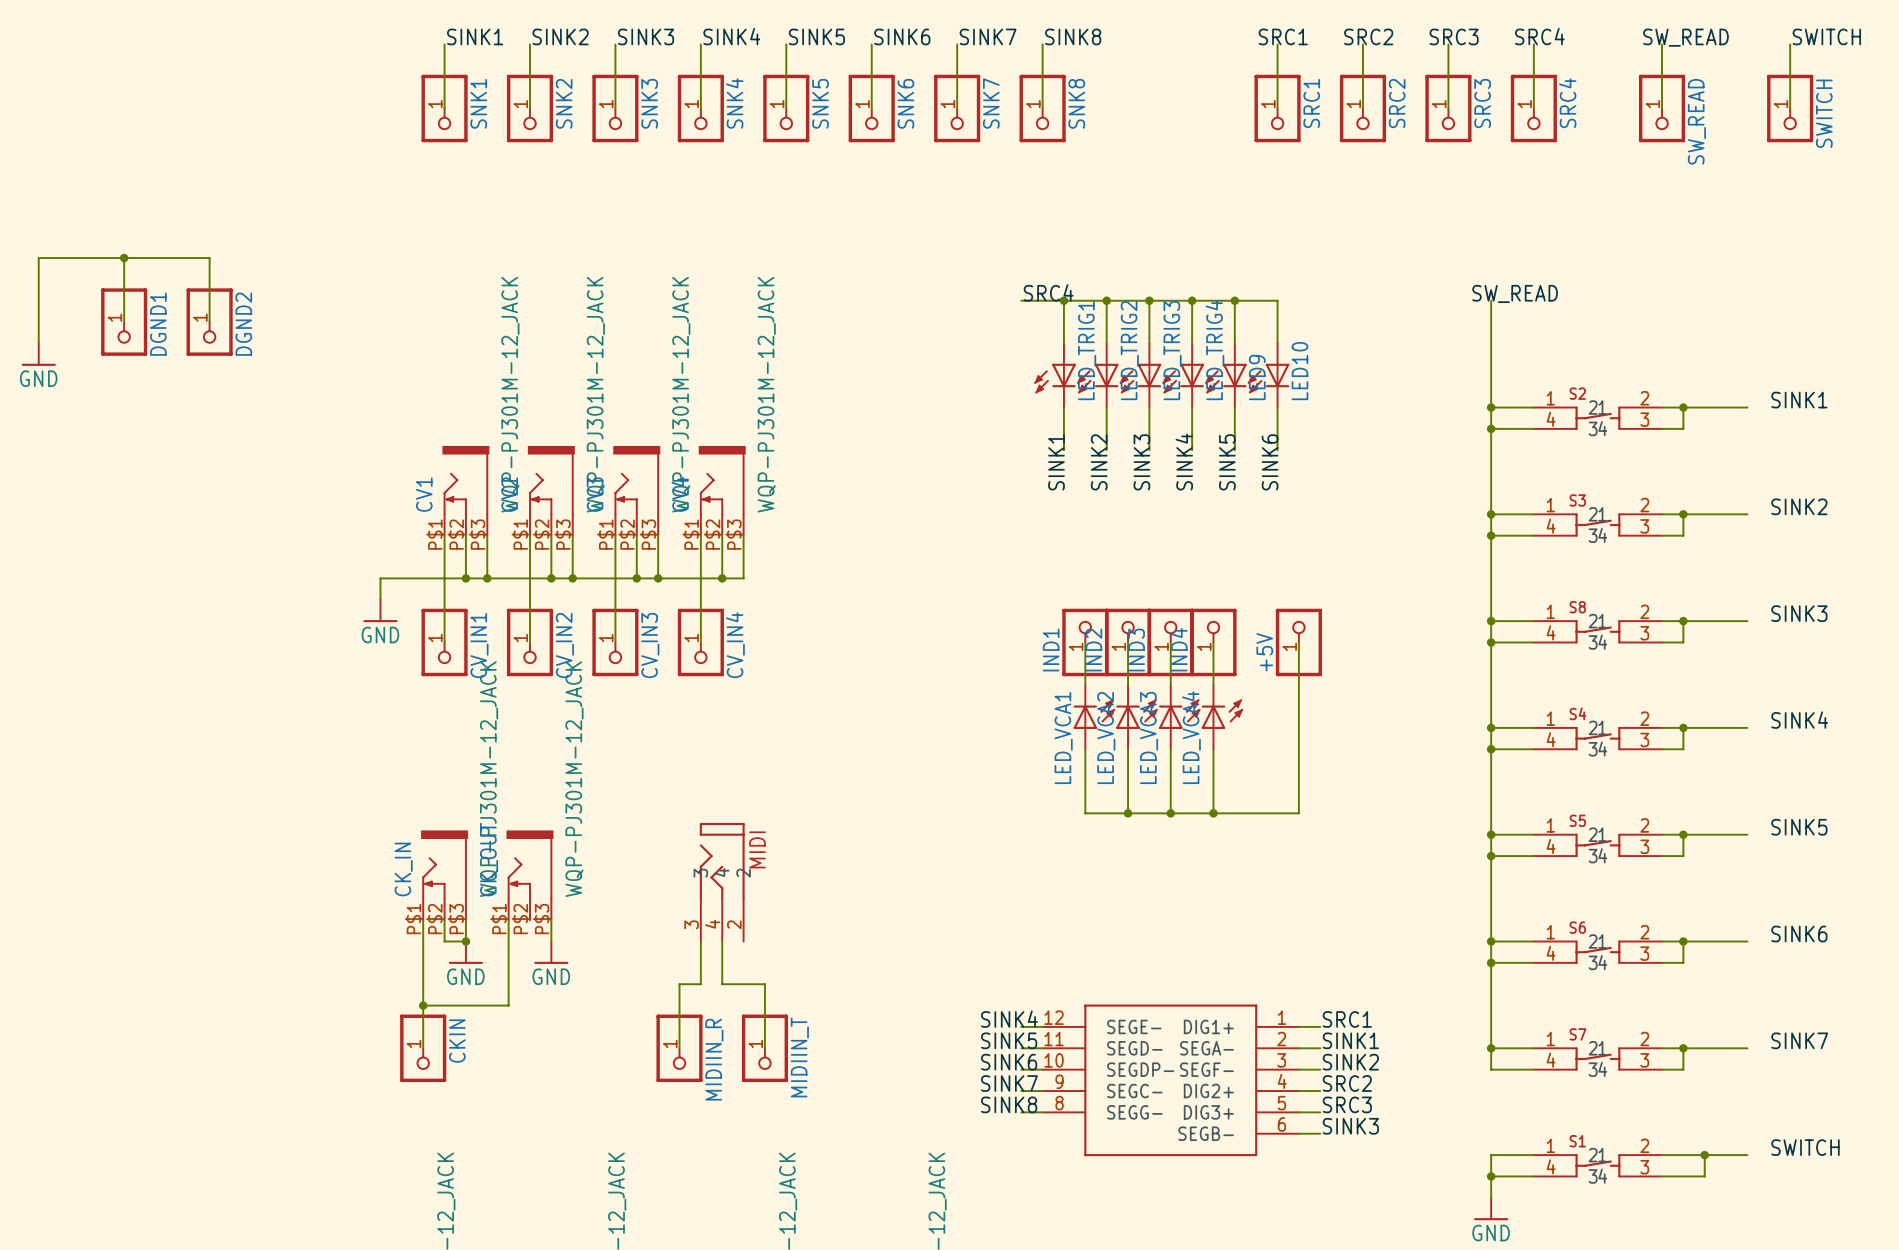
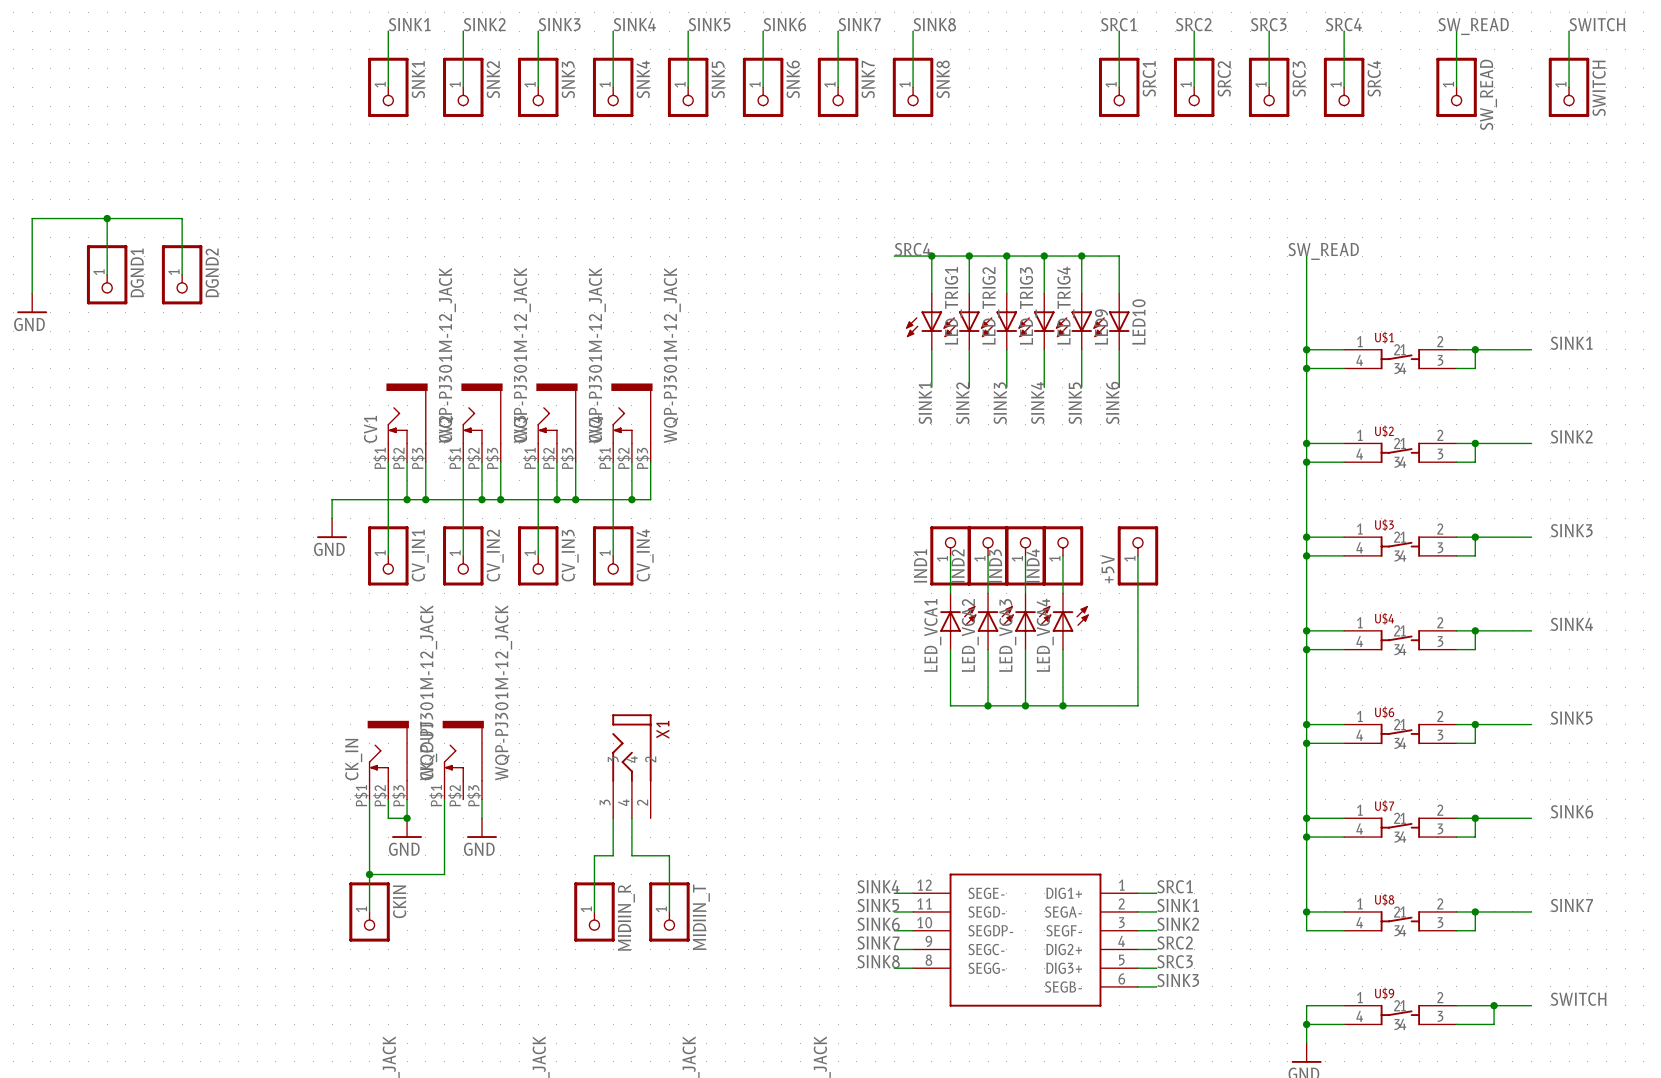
S2 name: S2 (1577, 393) -> U$1 (1384, 337)
S3 name: S3 (1577, 500) -> U$2 (1384, 431)
S8 name: S8 (1577, 607) -> U$3 (1384, 524)
S4 name: S4 (1577, 713) -> U$4 (1384, 618)
S5 name: S5 (1577, 820) -> U$6 (1384, 712)
MIDI name: MIDI (757, 849) -> X1 (662, 729)
S6 name: S6 (1577, 927) -> U$7 (1384, 806)
S7 name: S7 (1577, 1034) -> U$8 (1384, 899)
S1 name: S1 (1577, 1141) -> U$9 (1384, 993)

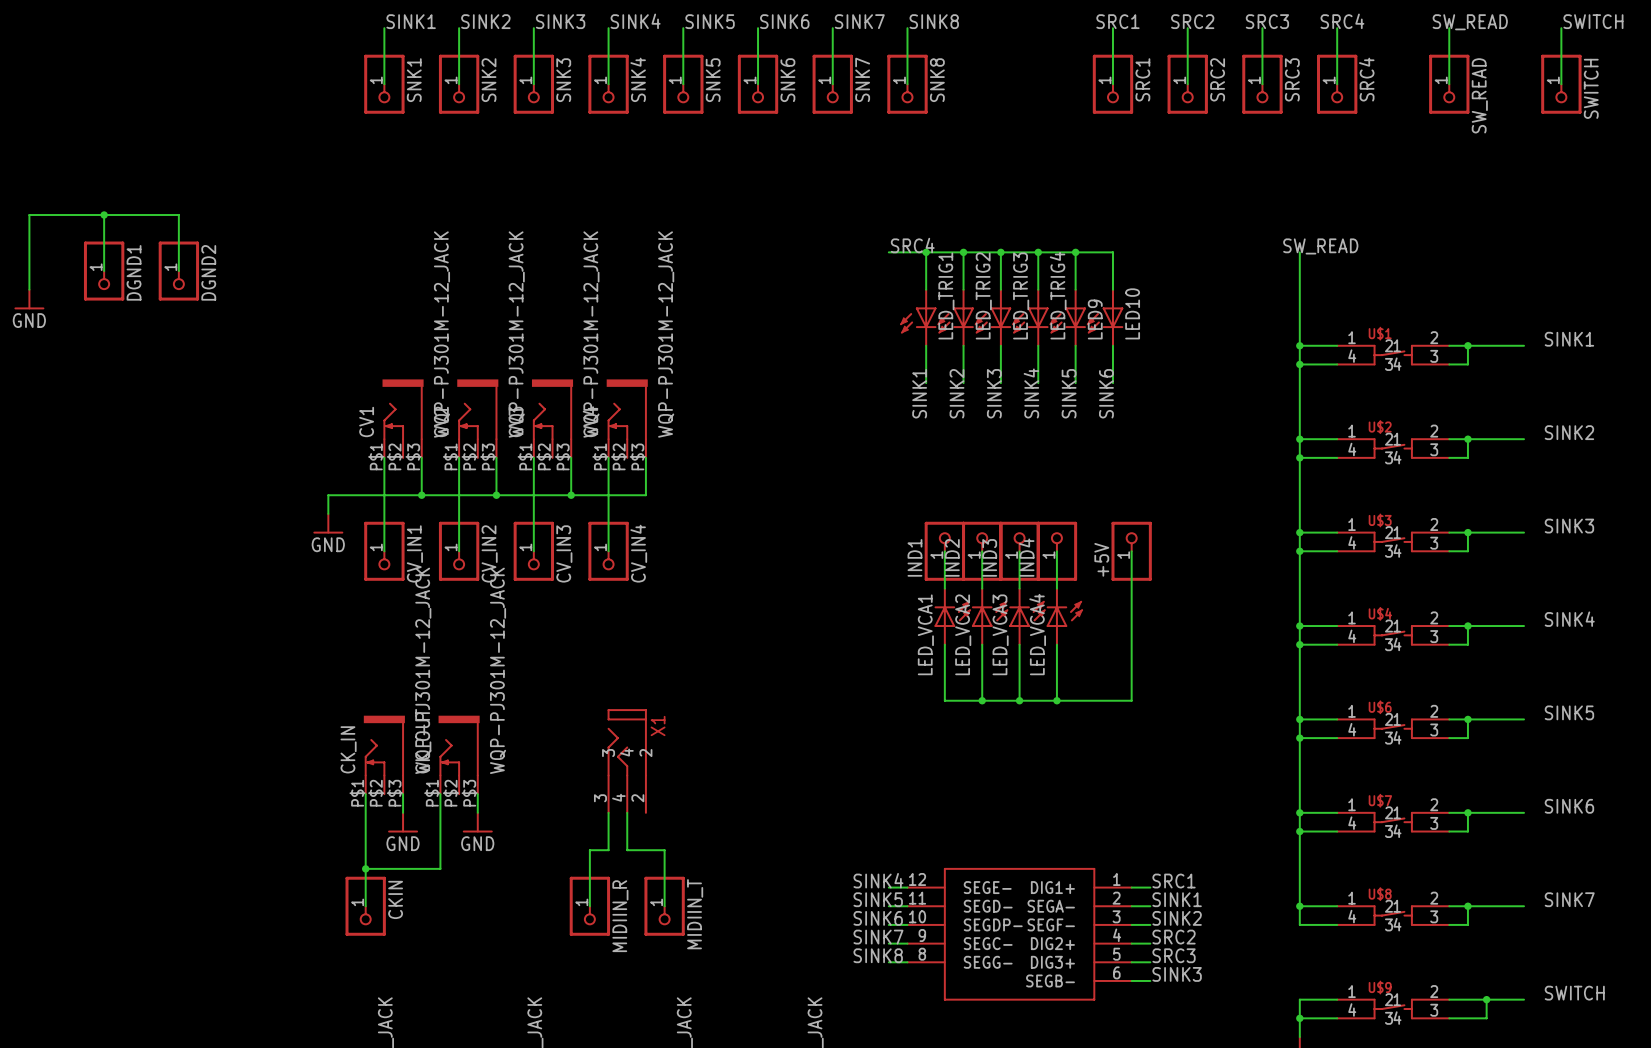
wire: (407, 462) (407, 499) -> none
wire: (482, 462) (482, 499) -> none
wire: (556, 462) (556, 499) -> none
wire: (631, 462) (631, 499) -> none
junction: (407, 499) -> none
junction: (482, 499) -> none
junction: (556, 499) -> none
junction: (631, 499) -> none
wire: (388, 799) (388, 818) (407, 818) -> none
junction: (407, 818) -> none

